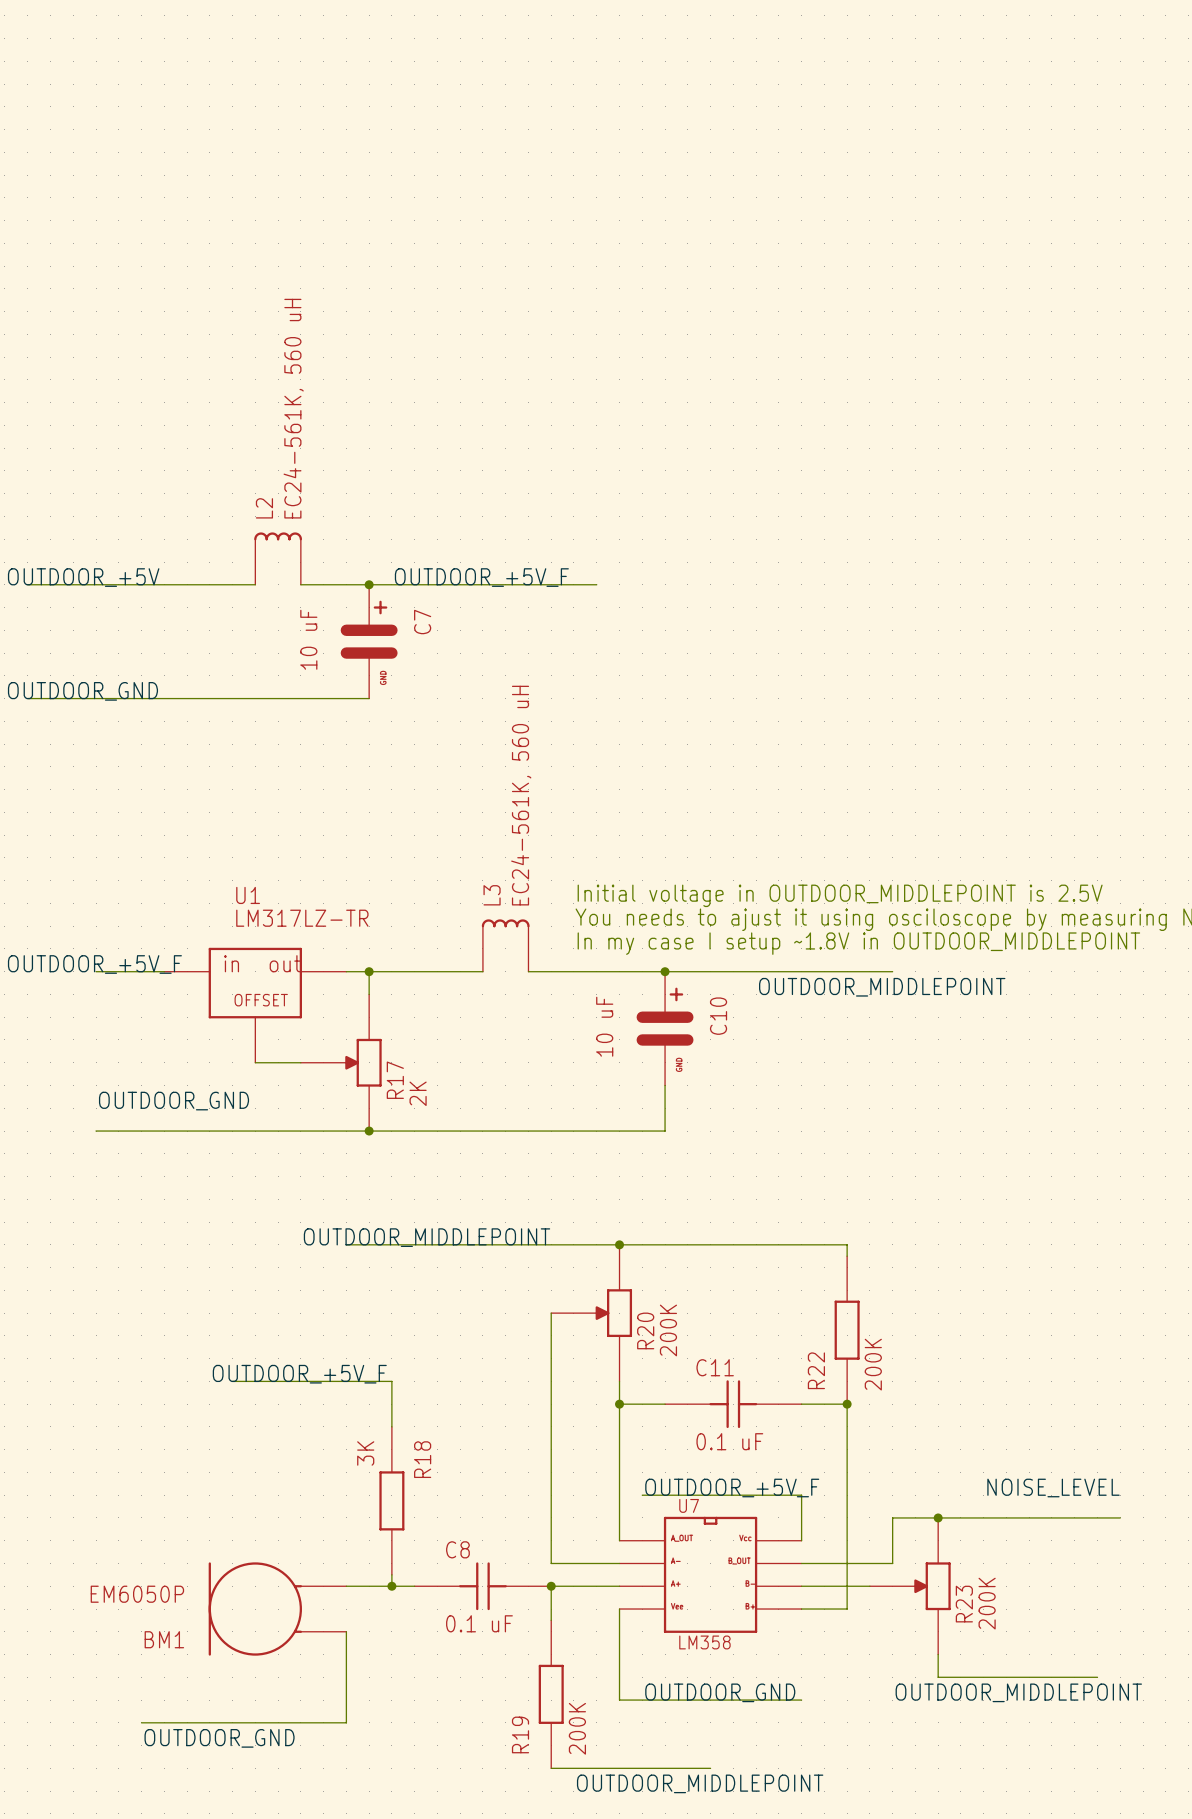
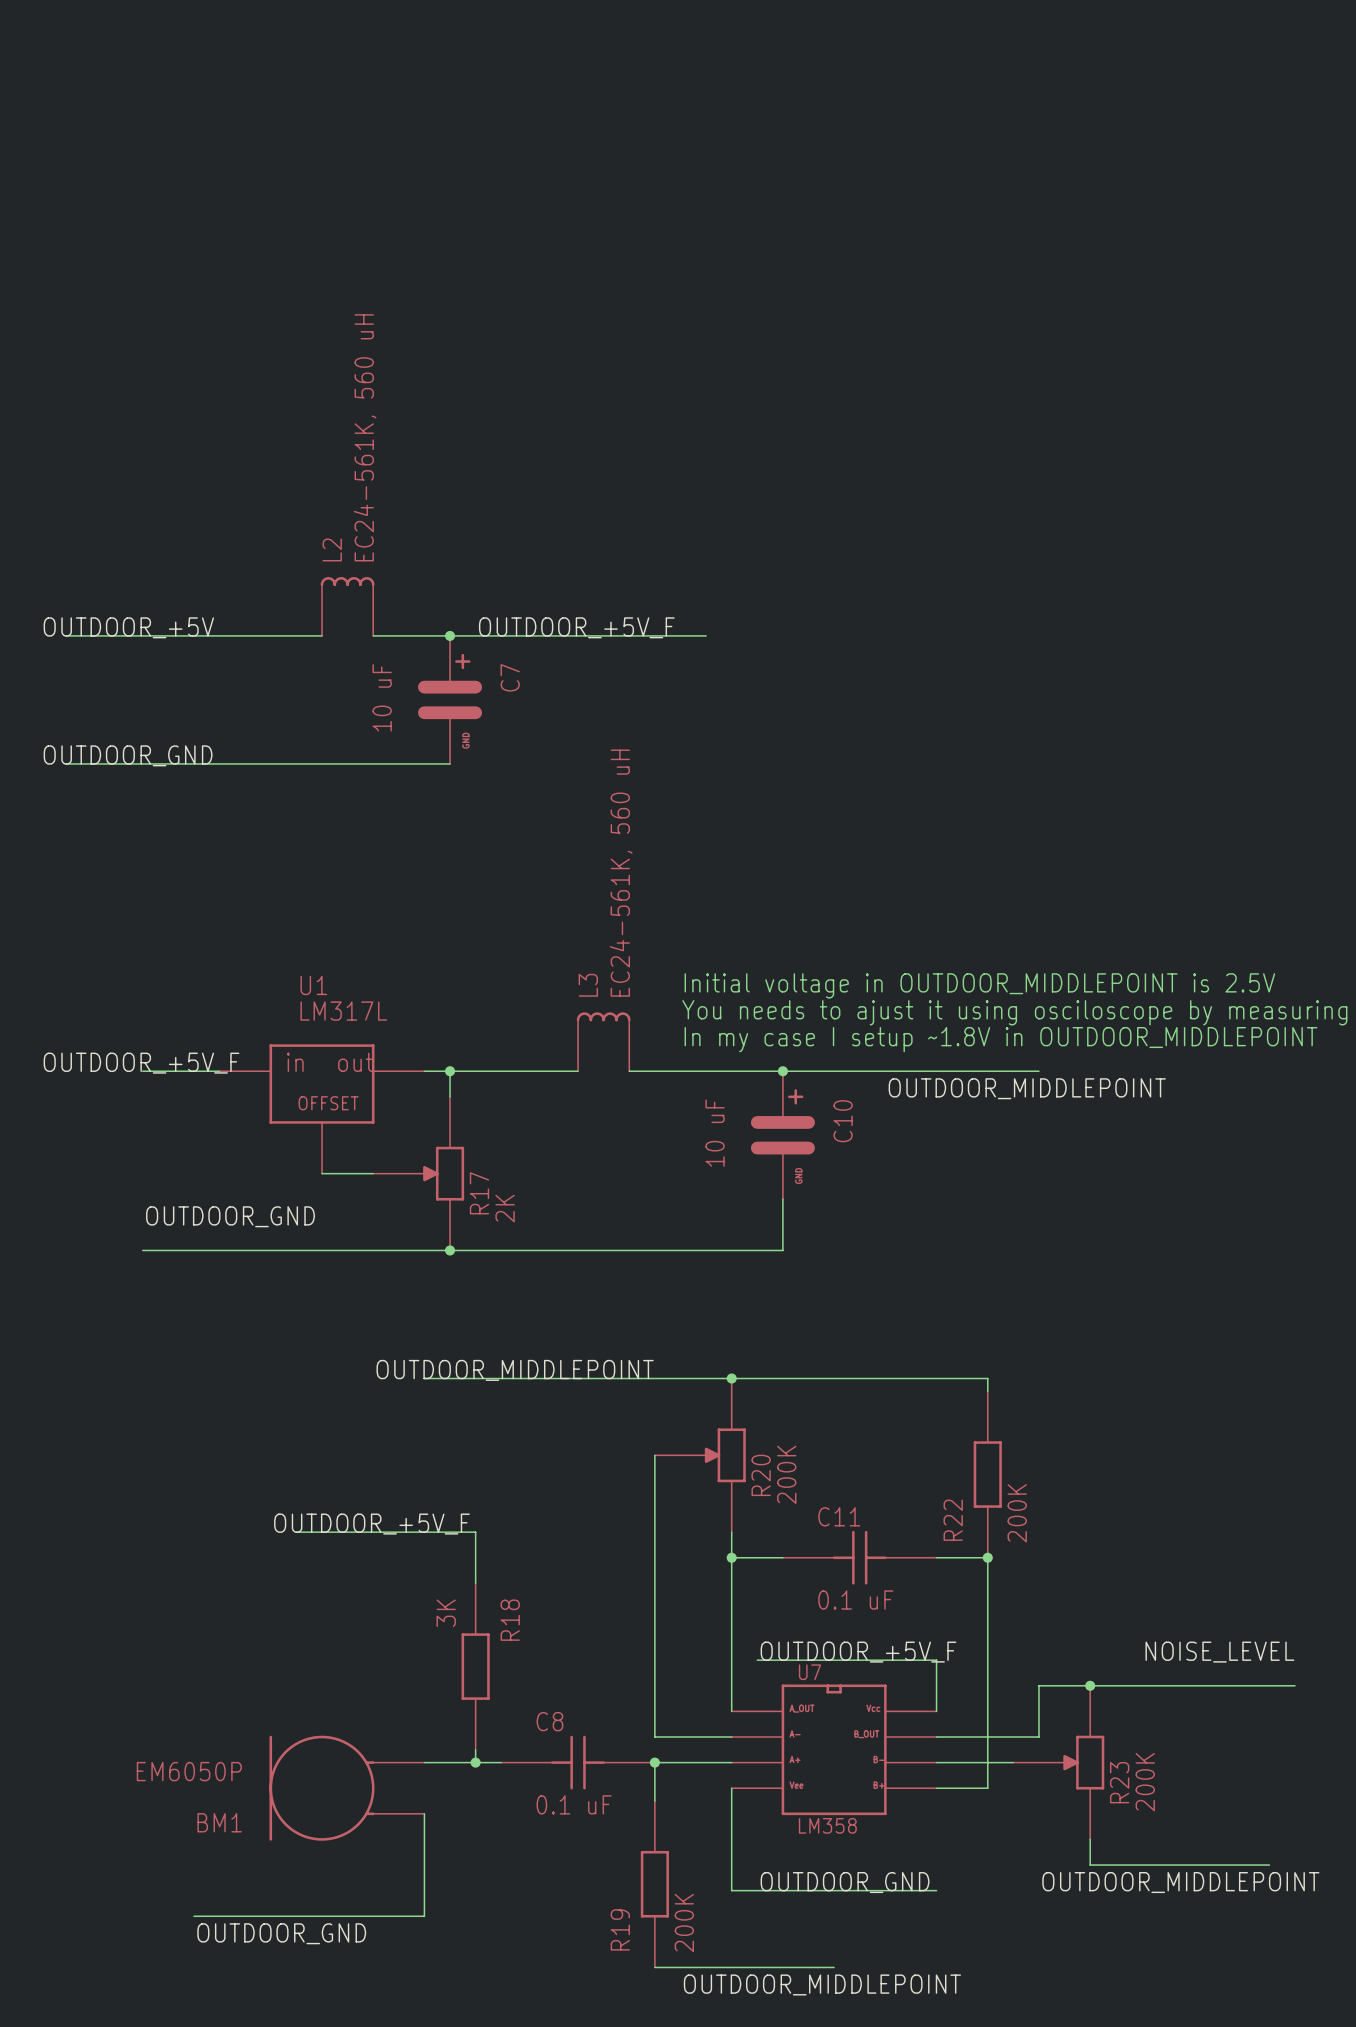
U1 value: LM317LZ-TR (302, 918) -> LM317L (343, 1011)

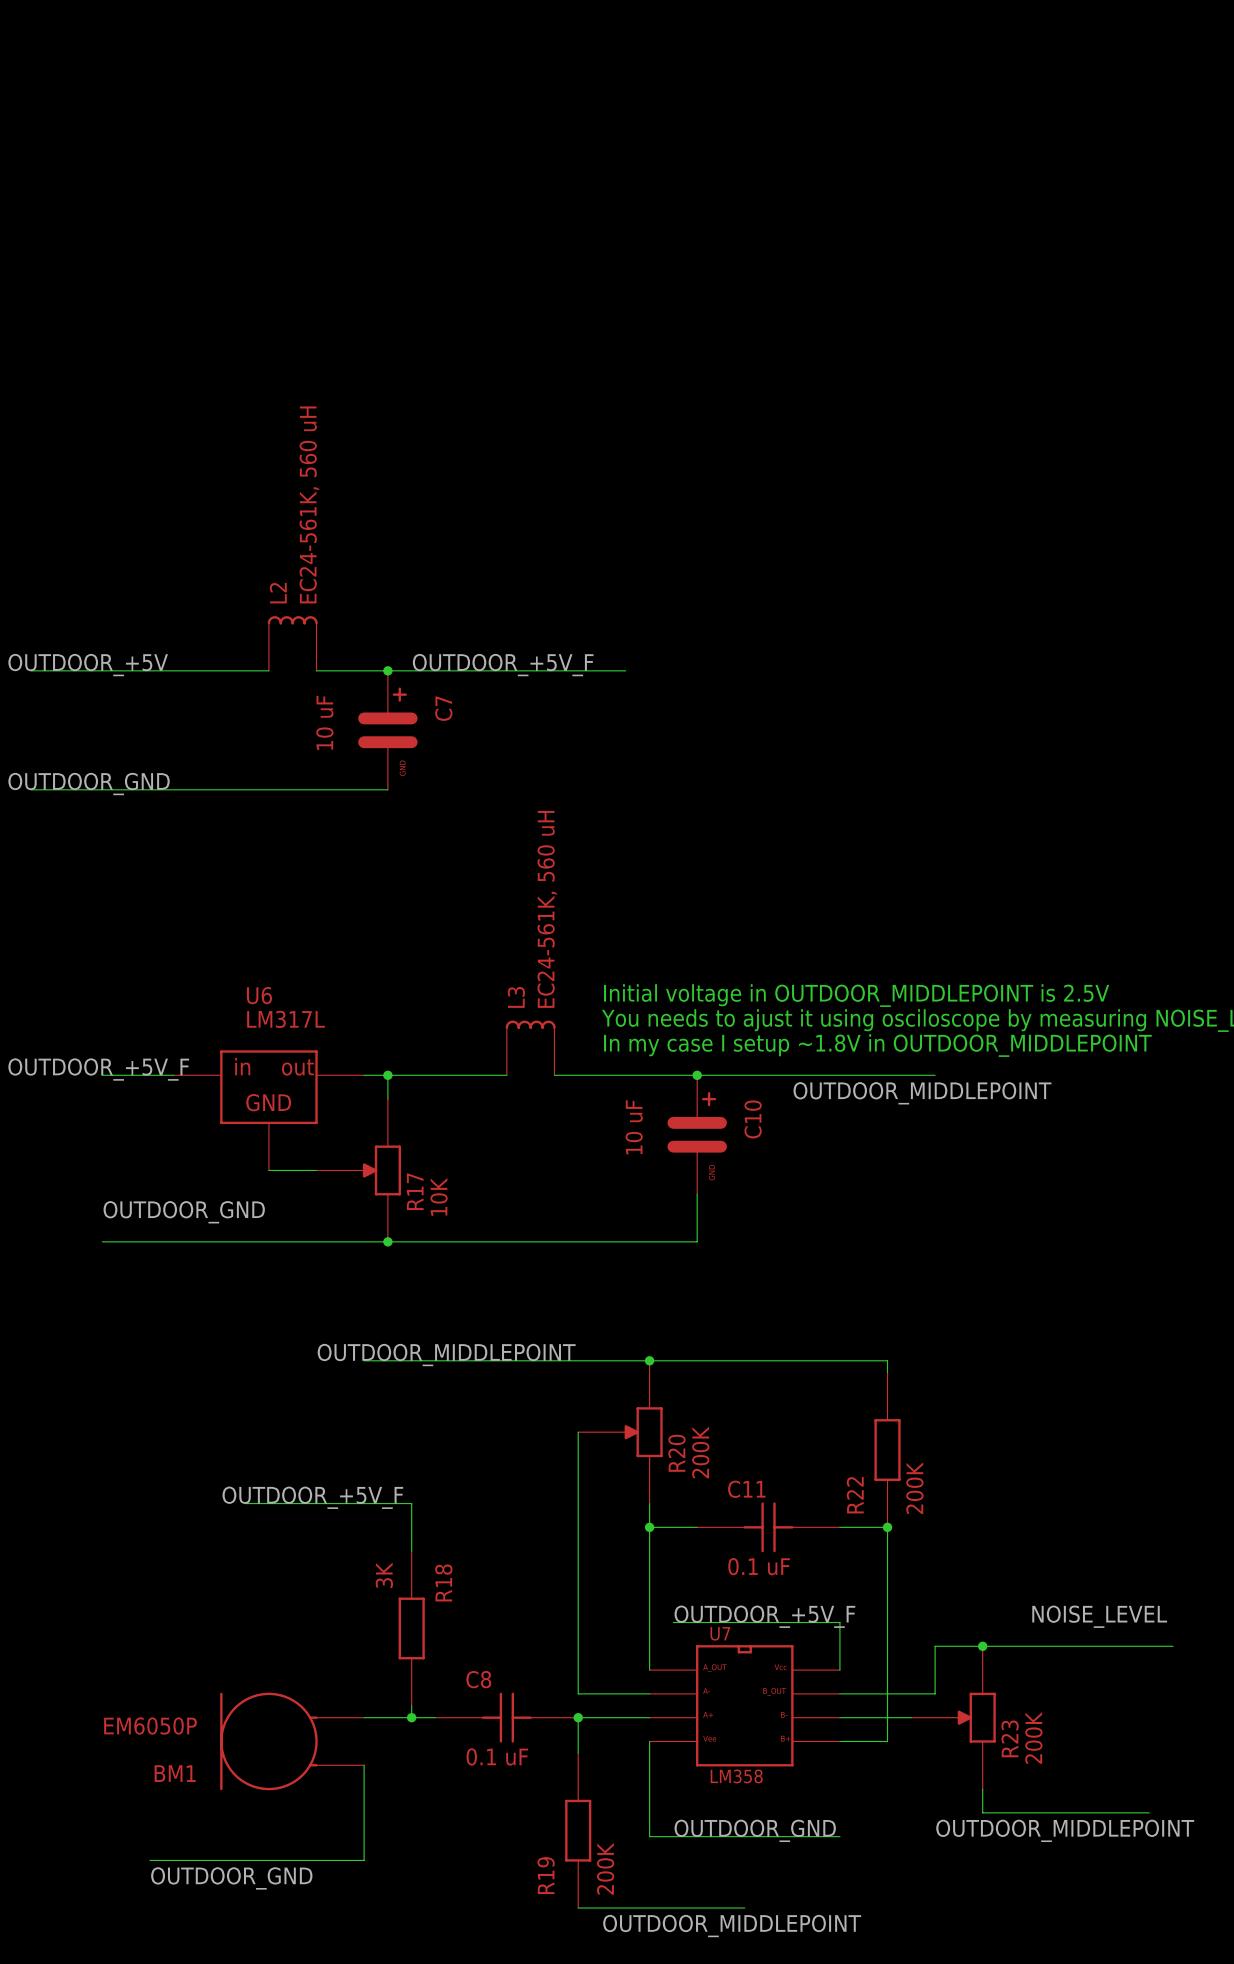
U1 name: U1 (313, 985) -> U6 (259, 995)
U1 text: none -> GND (268, 1102)
U1 text: OFFSET (328, 1103) -> none
R17 value: 2K (505, 1208) -> 10K (439, 1196)

